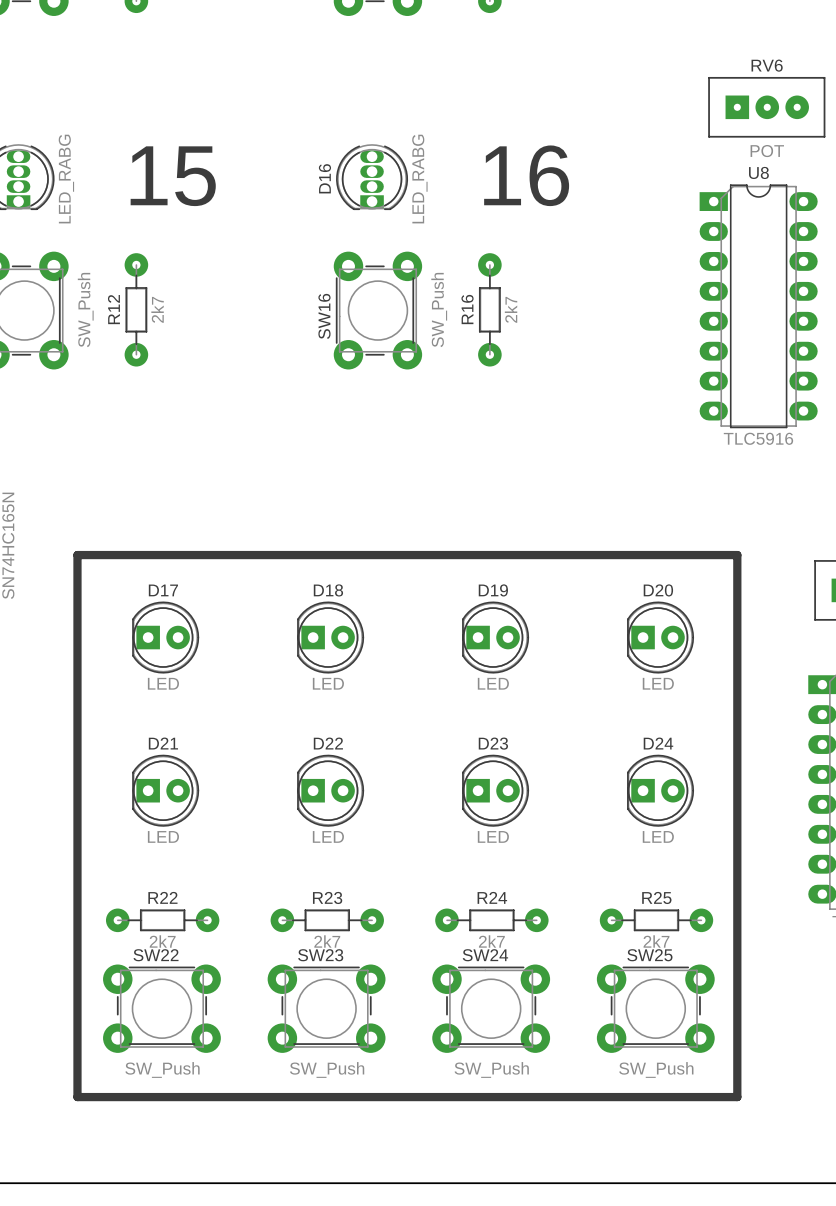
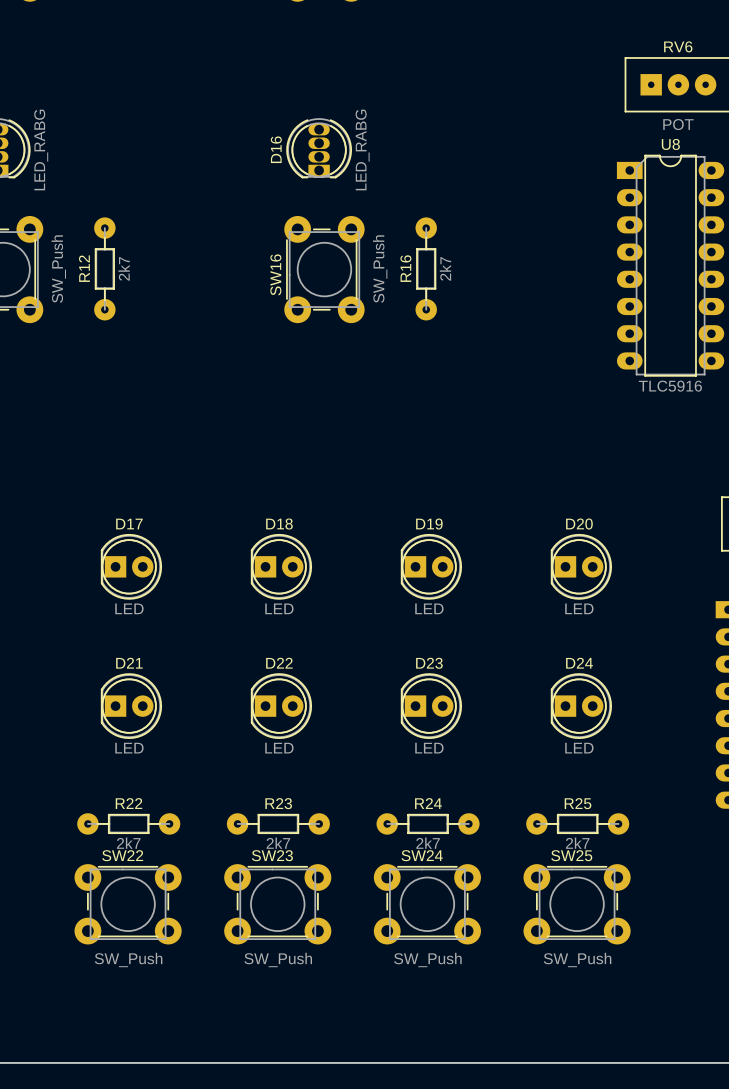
text: 16 (526, 175) -> none
text: 15 (173, 176) -> none
line: (77, 555) (77, 1097) (737, 1097) (737, 555) (77, 555) -> none

